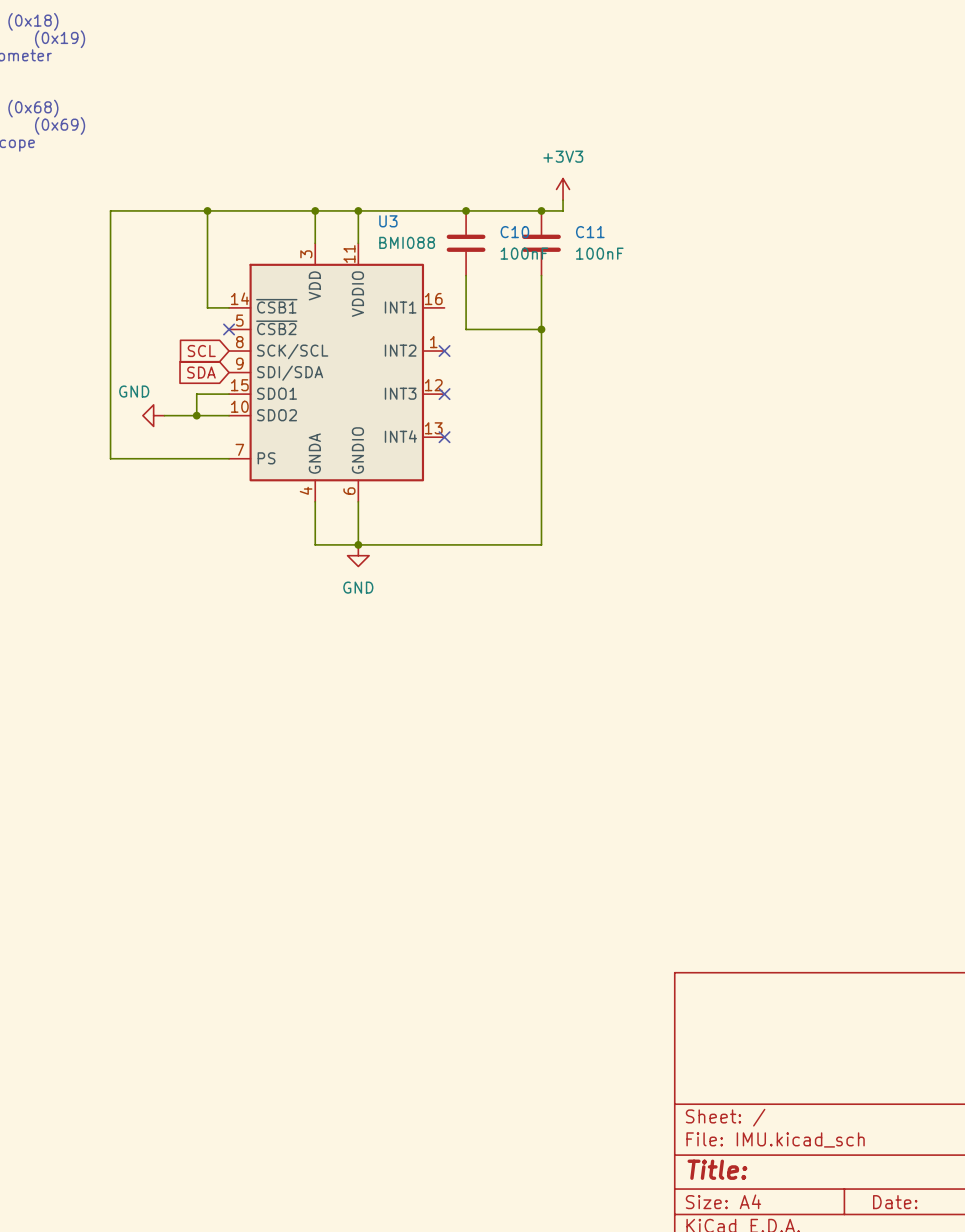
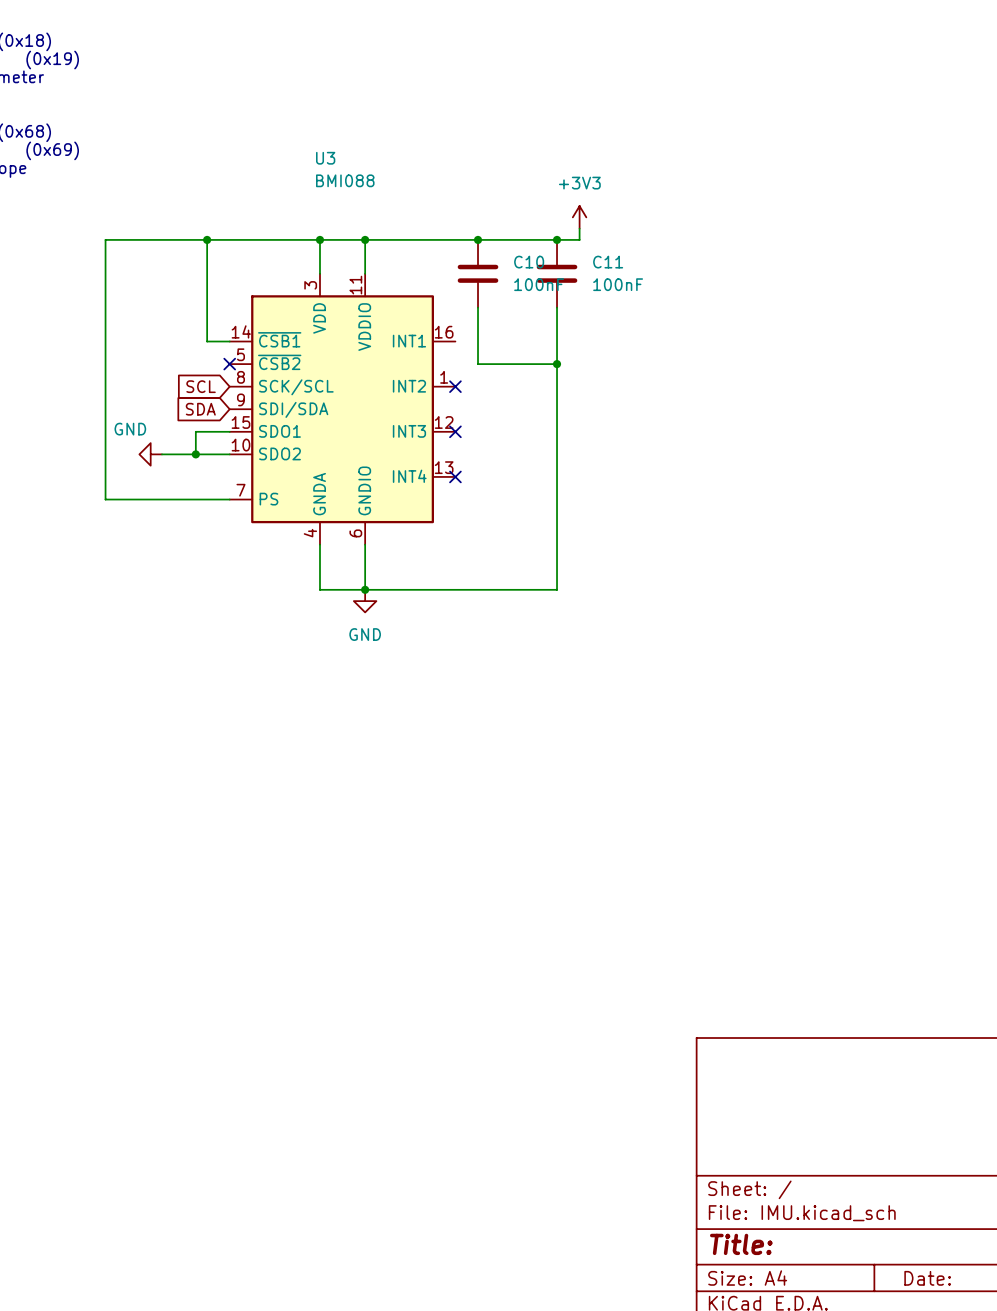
U3 name position: U3 (388, 221) -> U3 (325, 158)
U3 value position: BMI088 (407, 242) -> BMI088 (345, 180)

